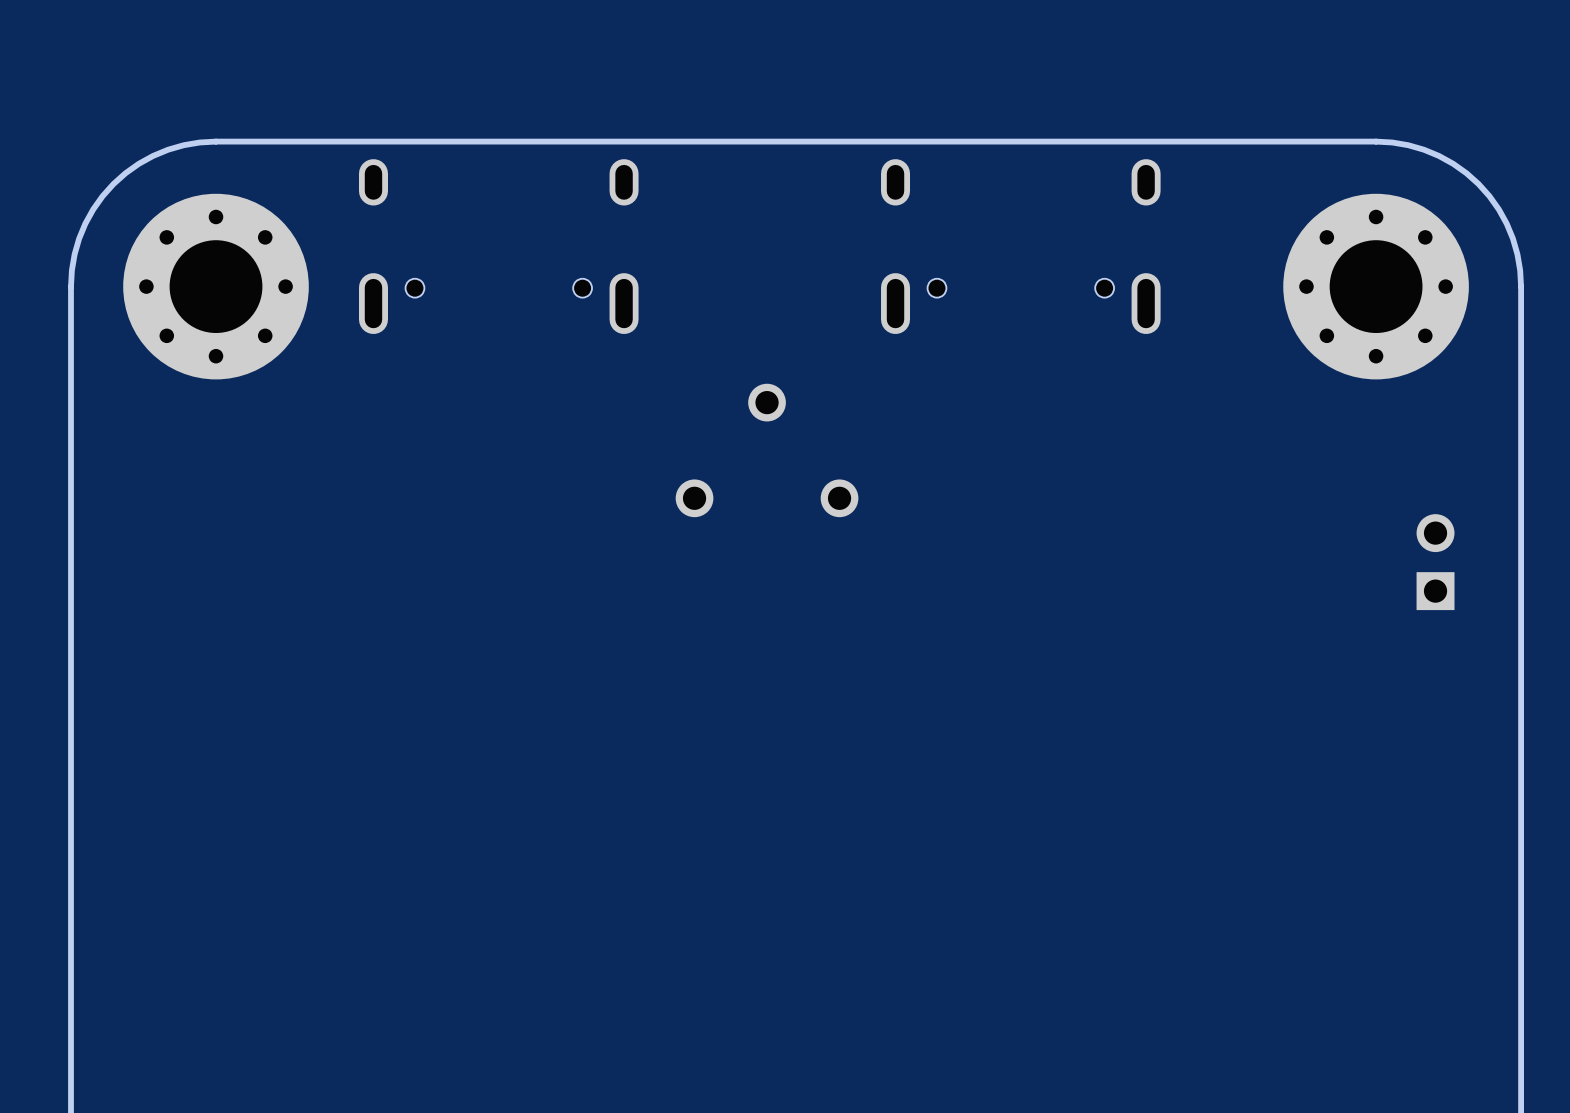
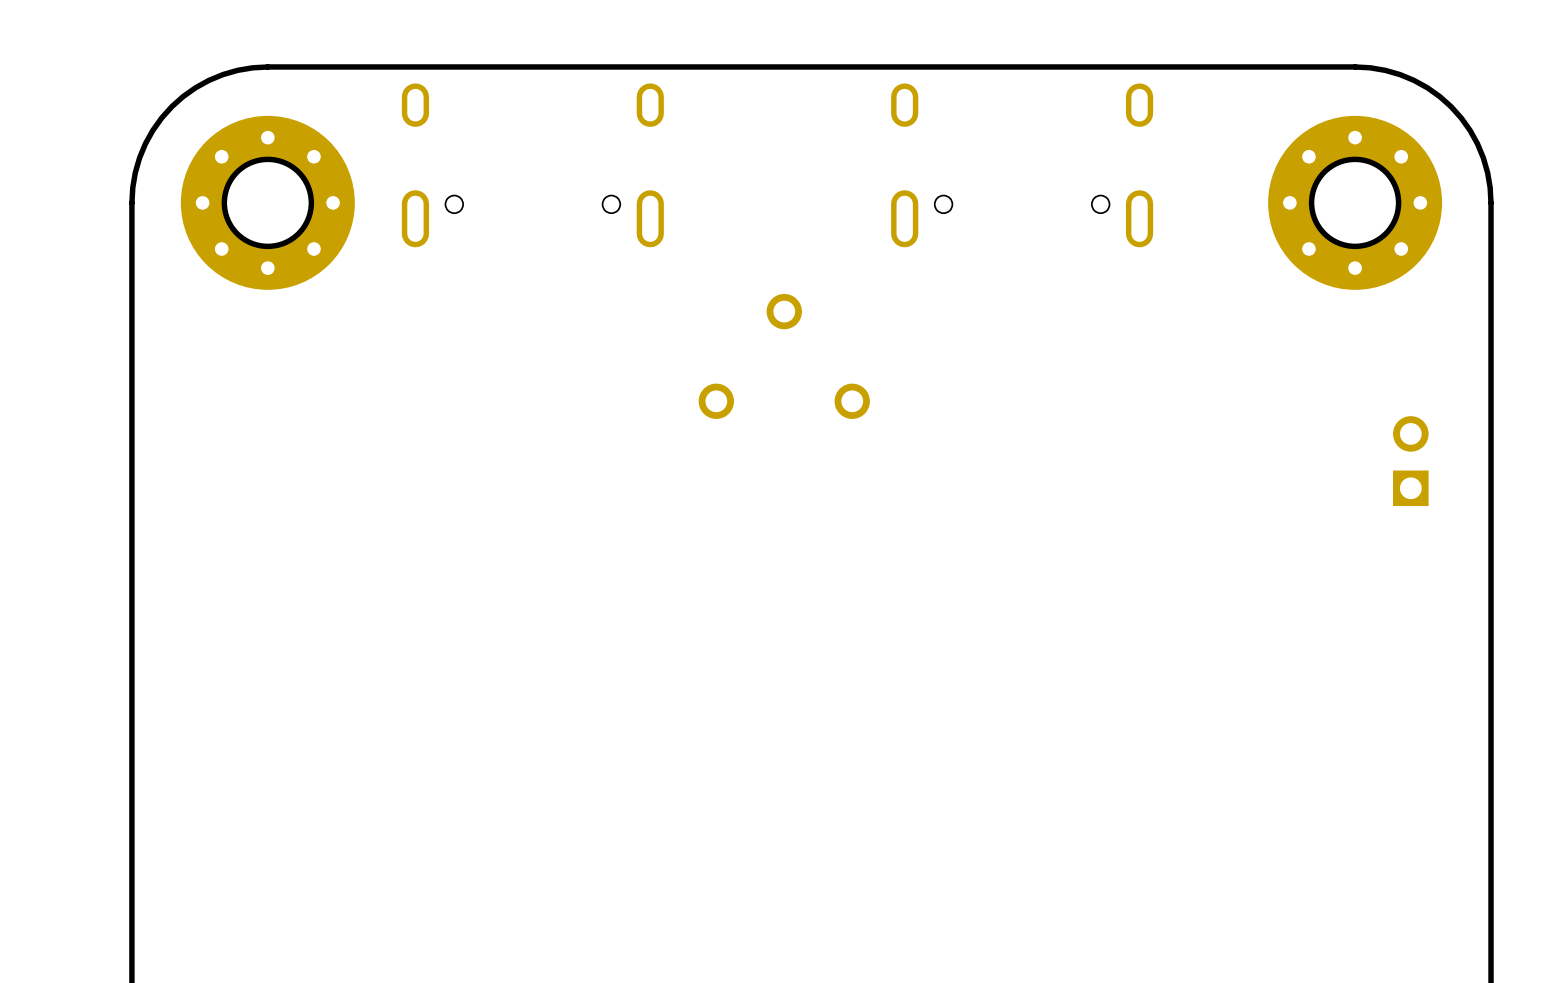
round board edge: none -> [221, 156, 315, 250]
round board edge: none -> [1308, 156, 1402, 250]

